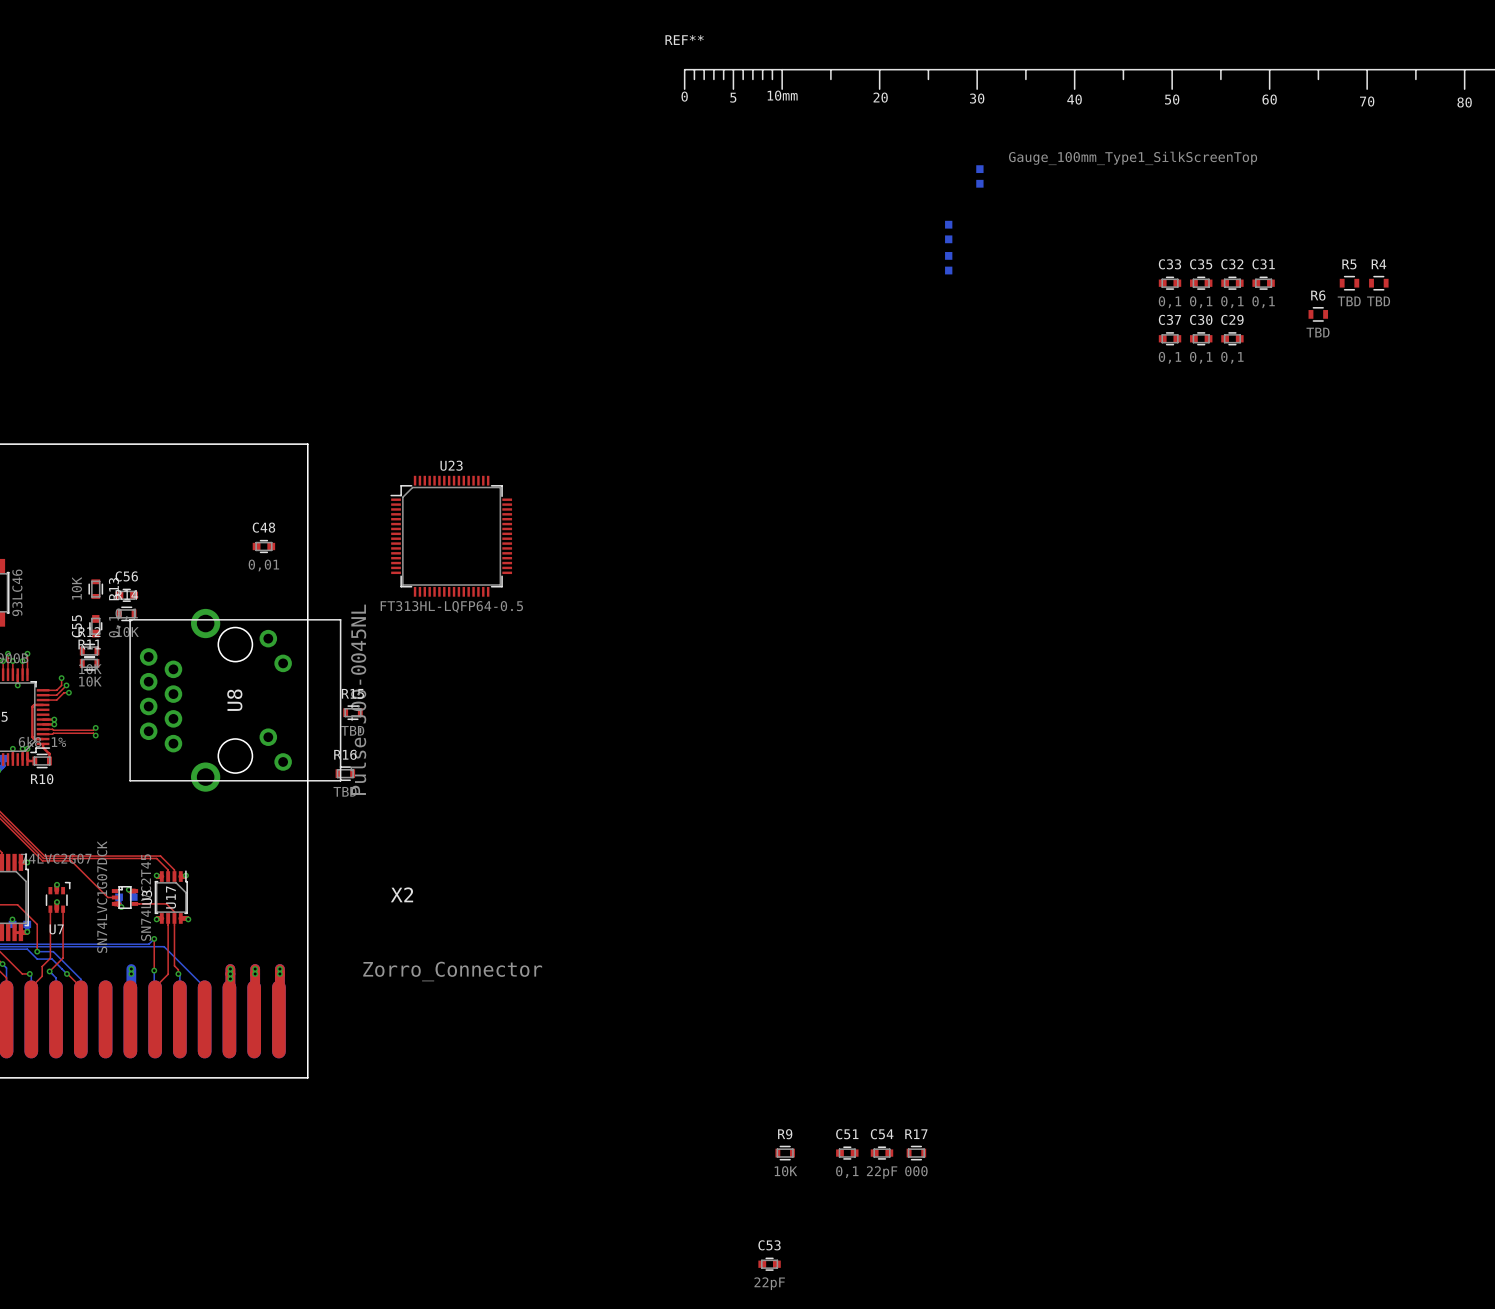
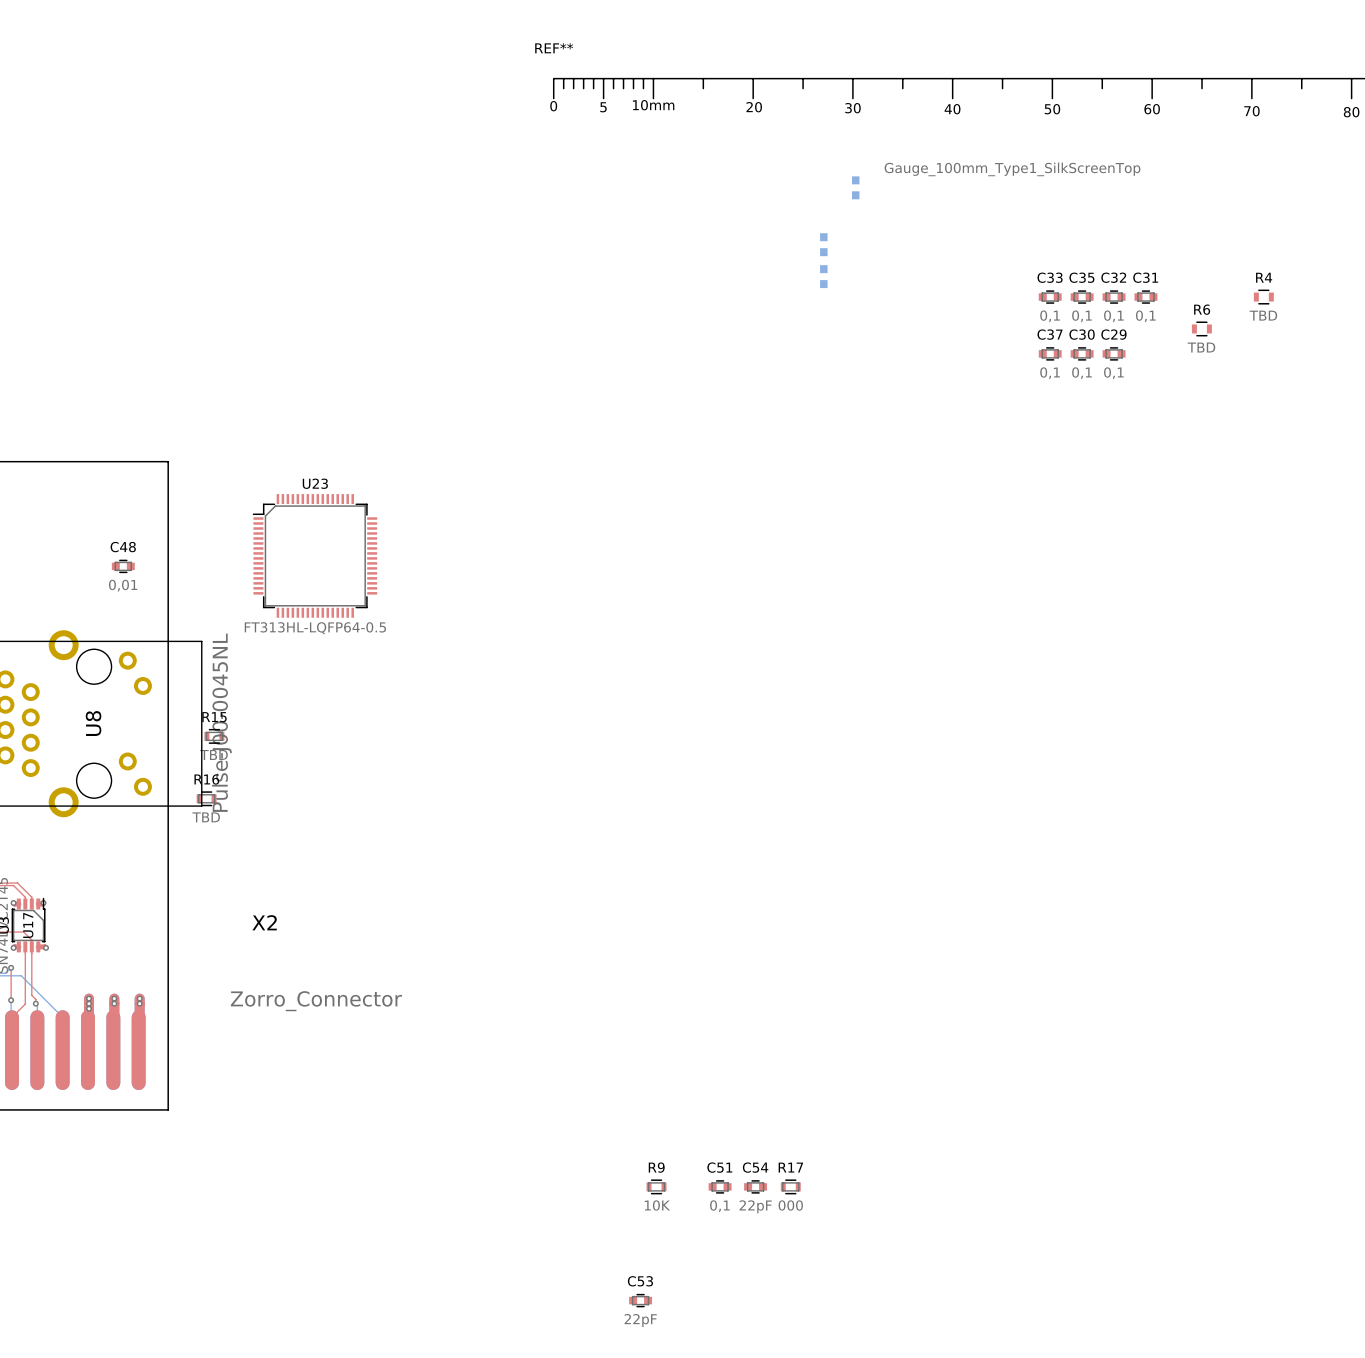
R5: TBD (1349, 283) -> none

